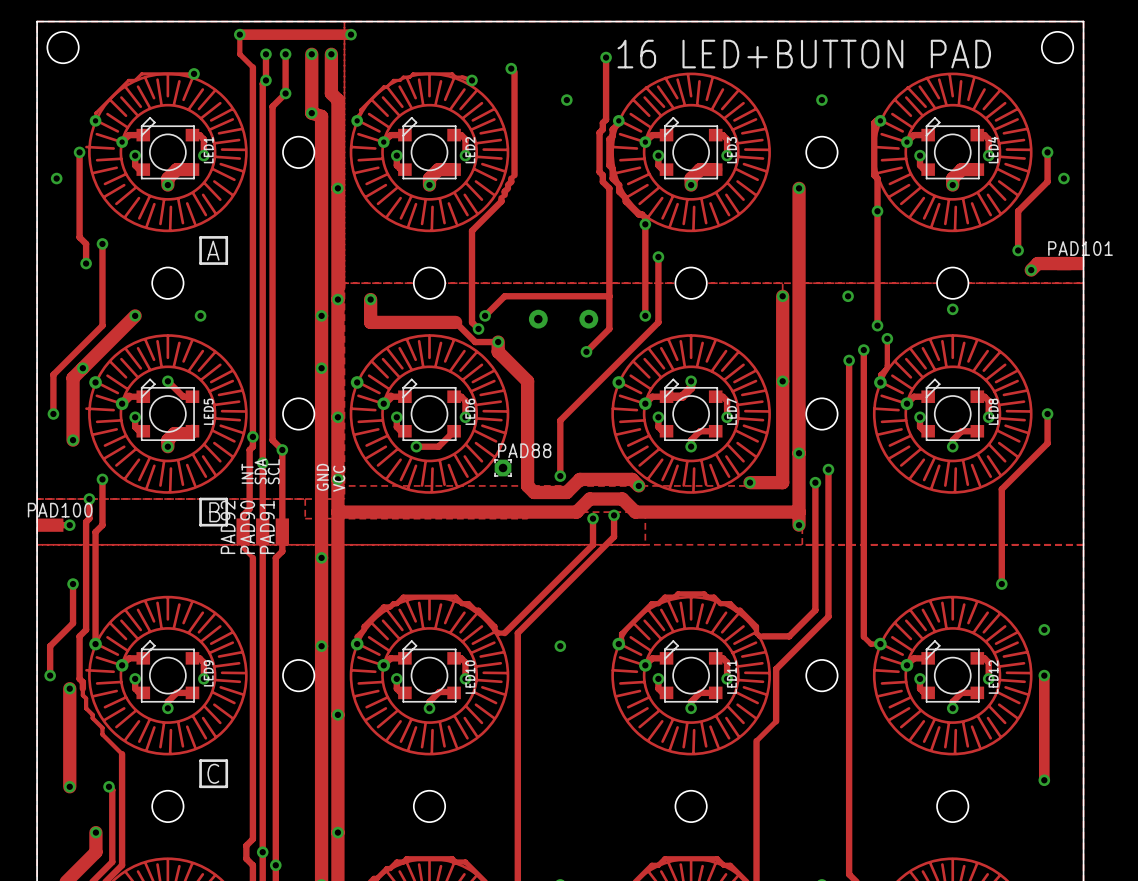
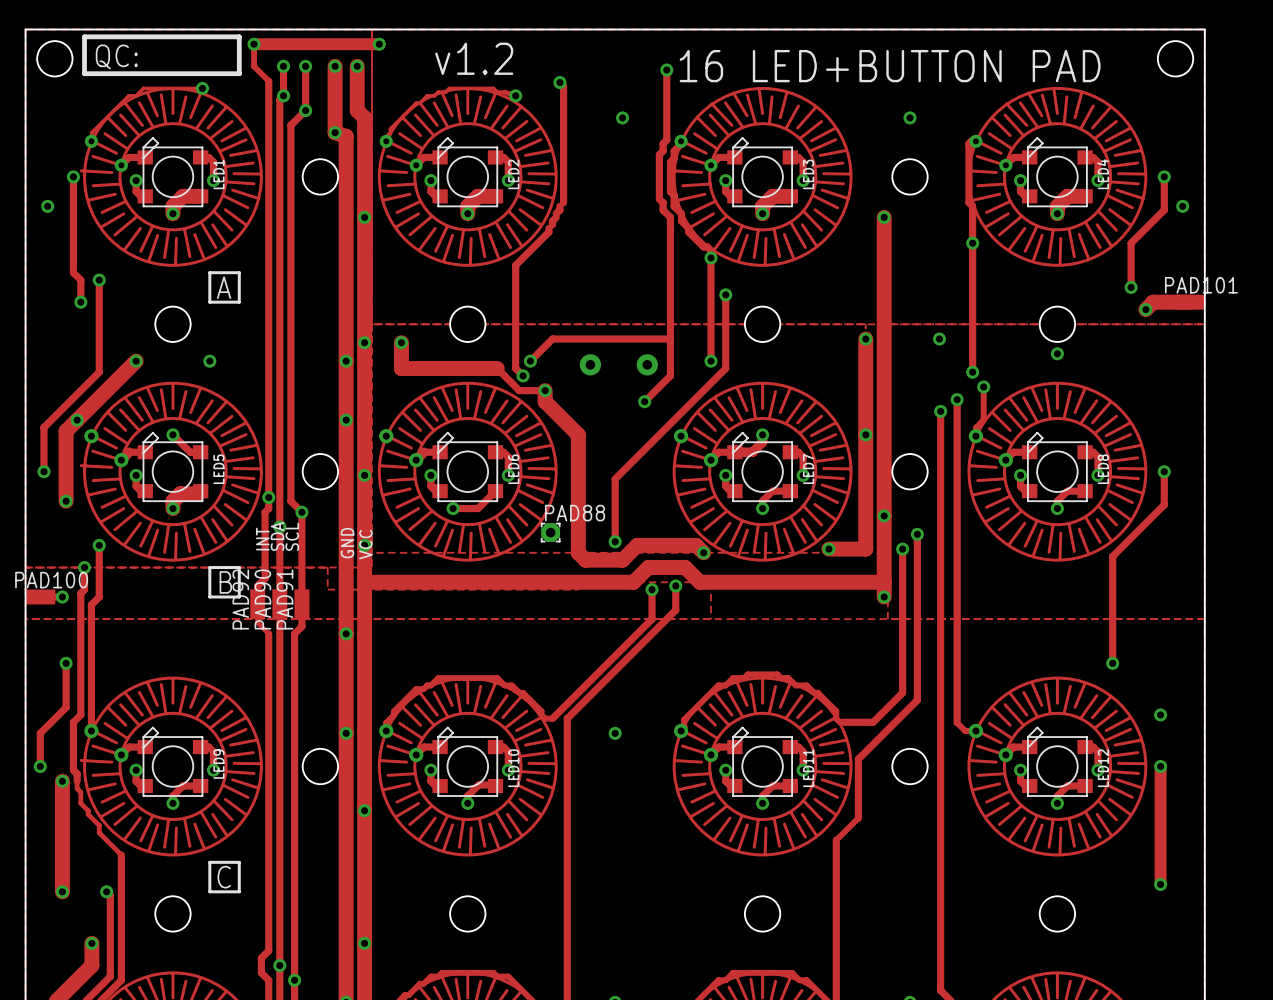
line: none -> (84, 36) (239, 36) (239, 73) (84, 73) (84, 36)
text: none -> QC: (116, 56)
text: none -> v1.2 (474, 58)

